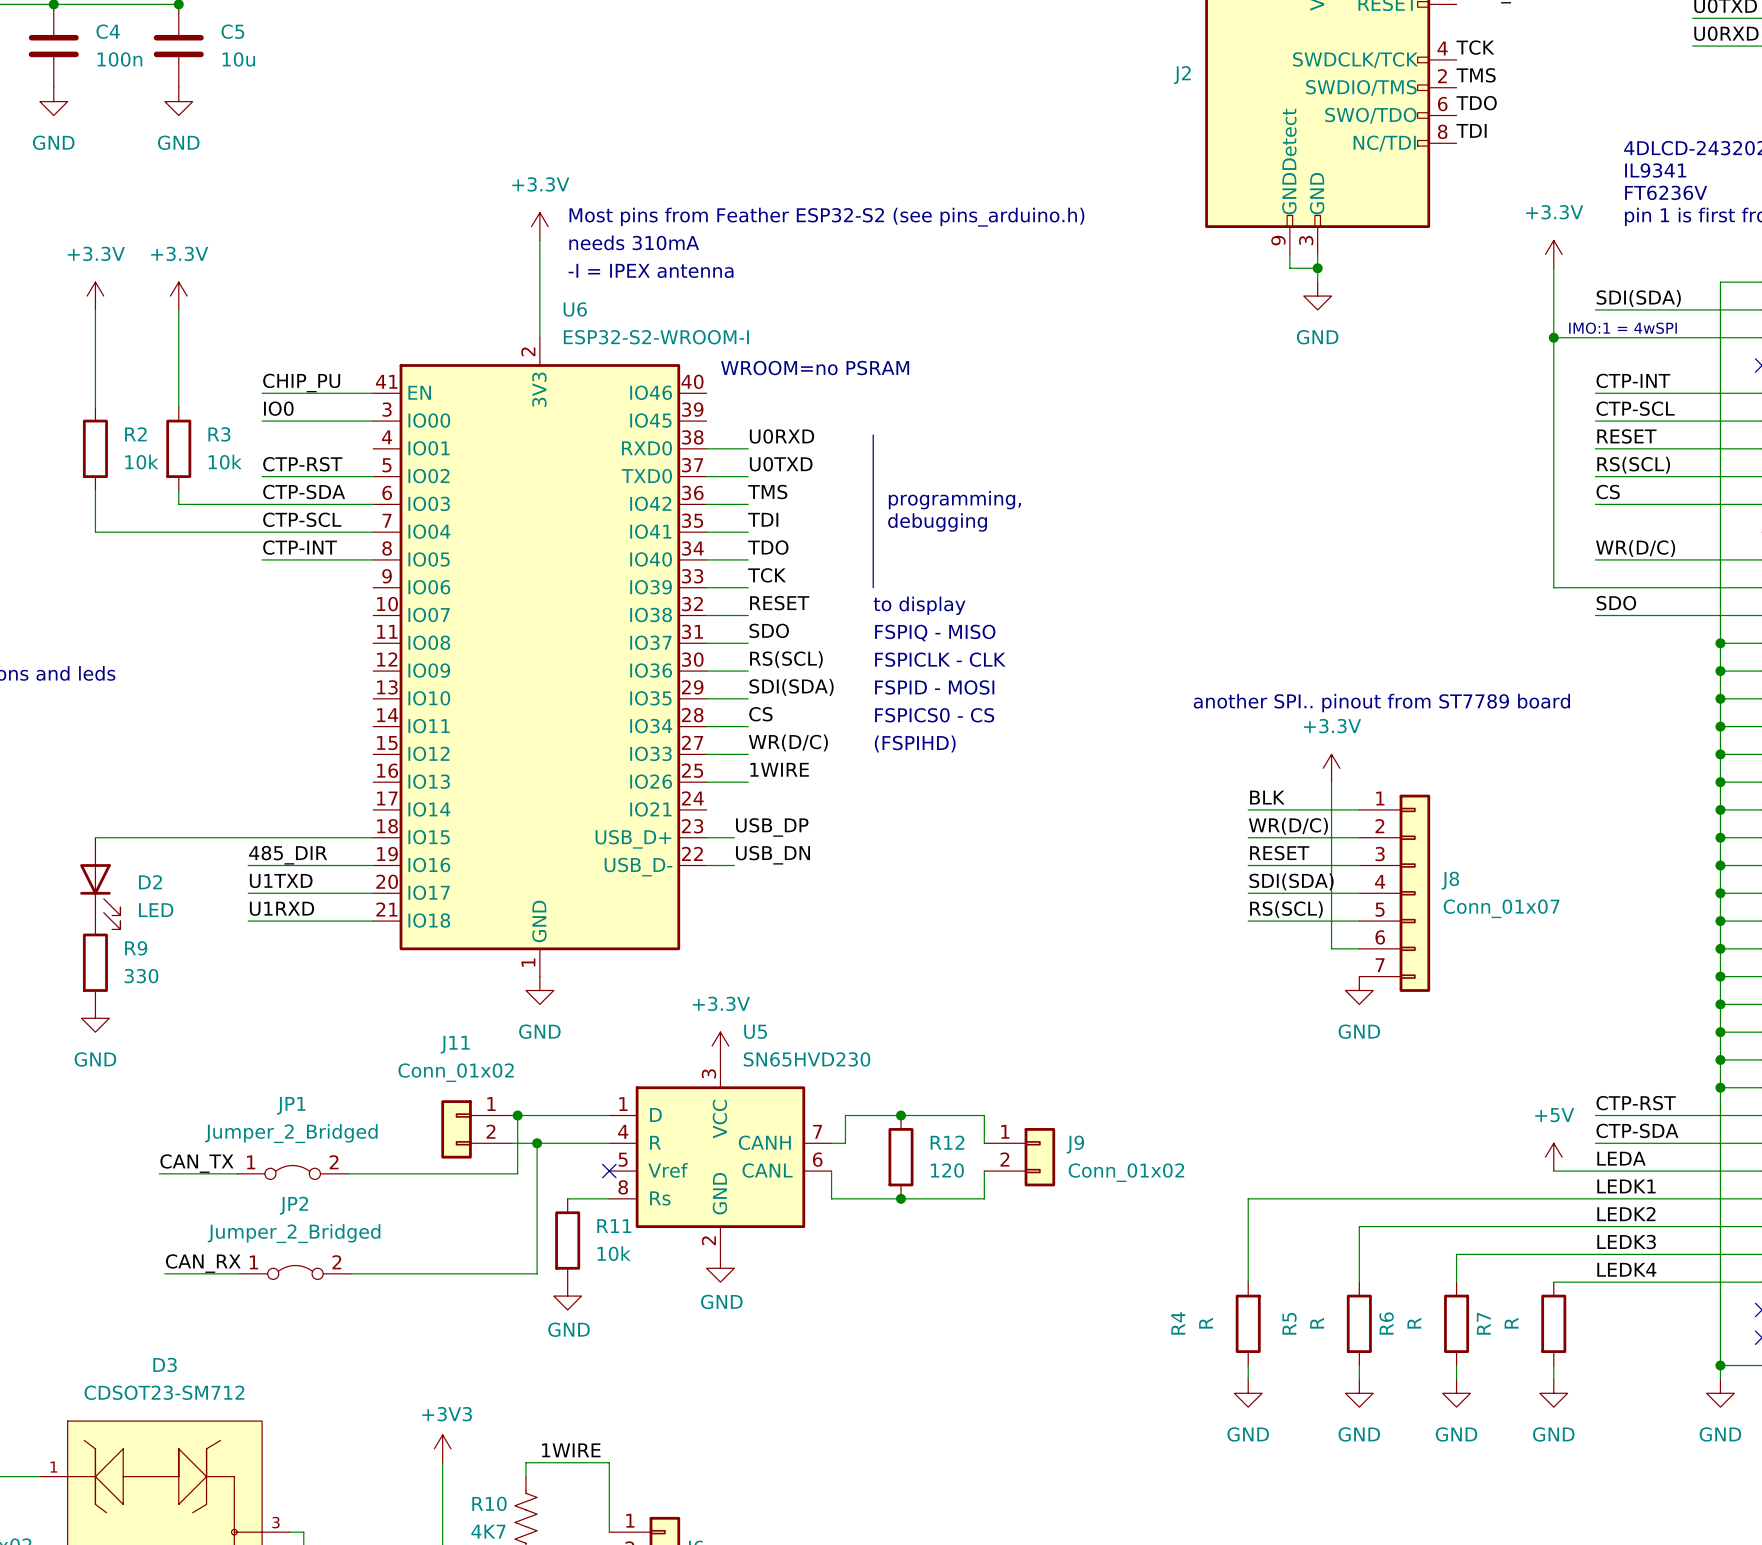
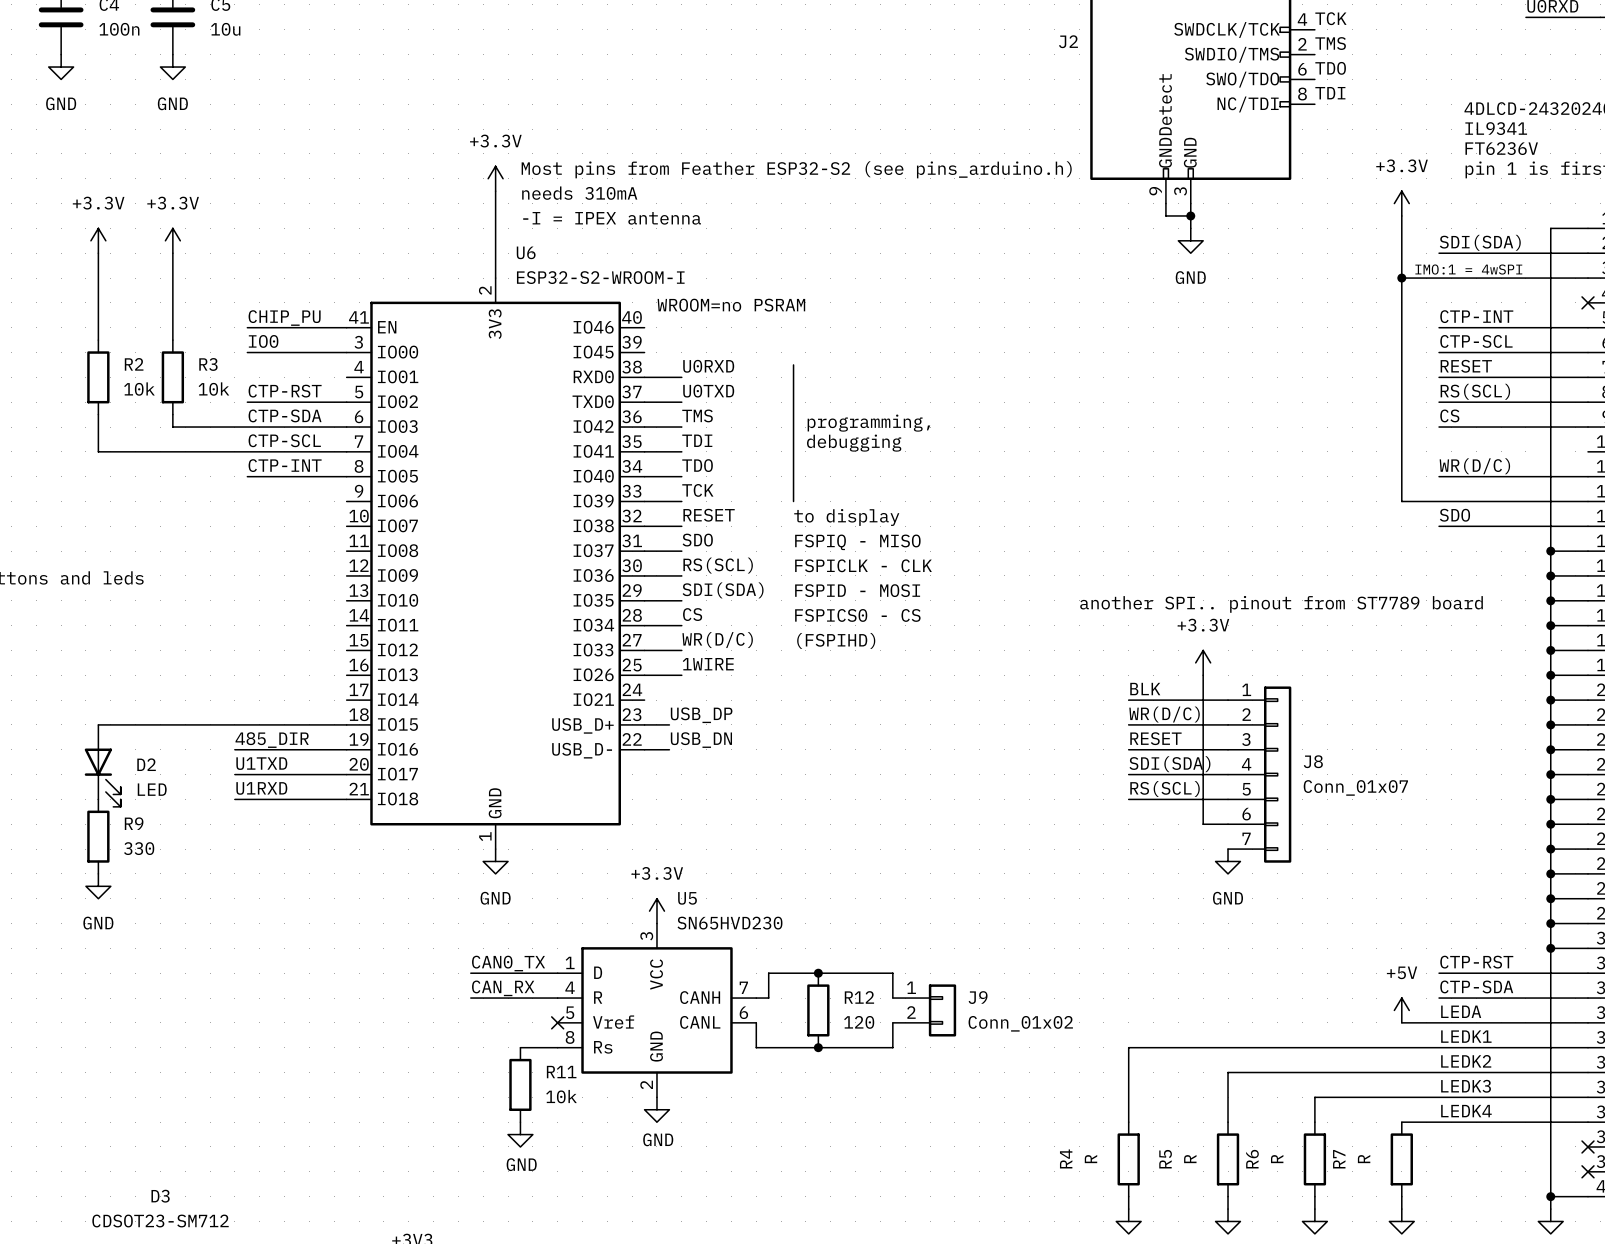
label: none -> CAN0_TX (508, 963)
wire: (517, 1115) (517, 1173) (348, 1173) -> none
junction: (517, 1115) -> none
J11: Conn_01x02 (476, 1129) -> none
label: none -> CAN_RX (503, 988)
wire: (537, 1143) (537, 1273) (351, 1273) -> none
junction: (537, 1143) -> none
label: CAN_TX (196, 1163) -> none
JP1: Jumper_2_Bridged (292, 1172) -> none
wire: (159, 1173) (237, 1173) -> none
label: CAN_RX (203, 1263) -> none
JP2: Jumper_2_Bridged (295, 1272) -> none
wire: (164, 1273) (239, 1273) -> none

